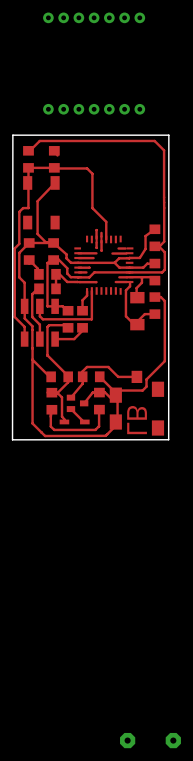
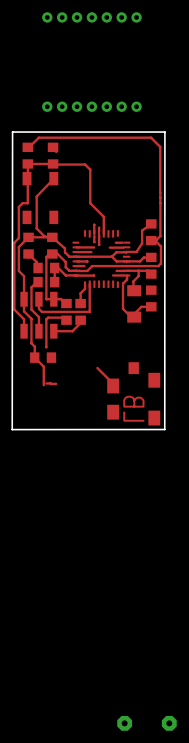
top track: (154, 297) (160, 297) (164, 301) (164, 361) (146, 379) (146, 386) (142, 390) (120, 390) (115, 395) (115, 399) -> none
top track: (24, 306) (24, 318) (32, 326) (32, 423) (45, 436) (105, 435) (107, 434) -> (24, 299) (24, 311) (31, 318) (31, 343) (34, 346) (34, 357) (43, 366) (43, 385)
top track: (47, 355) (68, 376) (68, 382) (57, 393) (62, 397) (62, 416) (64, 421) -> none
top track: (32, 359) (51, 376) -> none
part: none -> (43, 357)
part: (59, 376) -> none
part: (91, 376) -> none
top track: (136, 376) (118, 376) (108, 366) (87, 366) (82, 371) (82, 383) (70, 397) -> none
top track: (115, 399) (117, 401) (117, 423) (107, 434) -> none
top track: (115, 399) (111, 399) (104, 392) (92, 392) (84, 403) -> none
part: (51, 401) -> none
part: (99, 401) -> none
part: (77, 403) -> none
top track: (70, 409) (82, 422) (84, 421) -> none
top track: (99, 409) (99, 426) (95, 429) (54, 429) (50, 426) (51, 409) (50, 416) -> none
part: (74, 421) -> none

